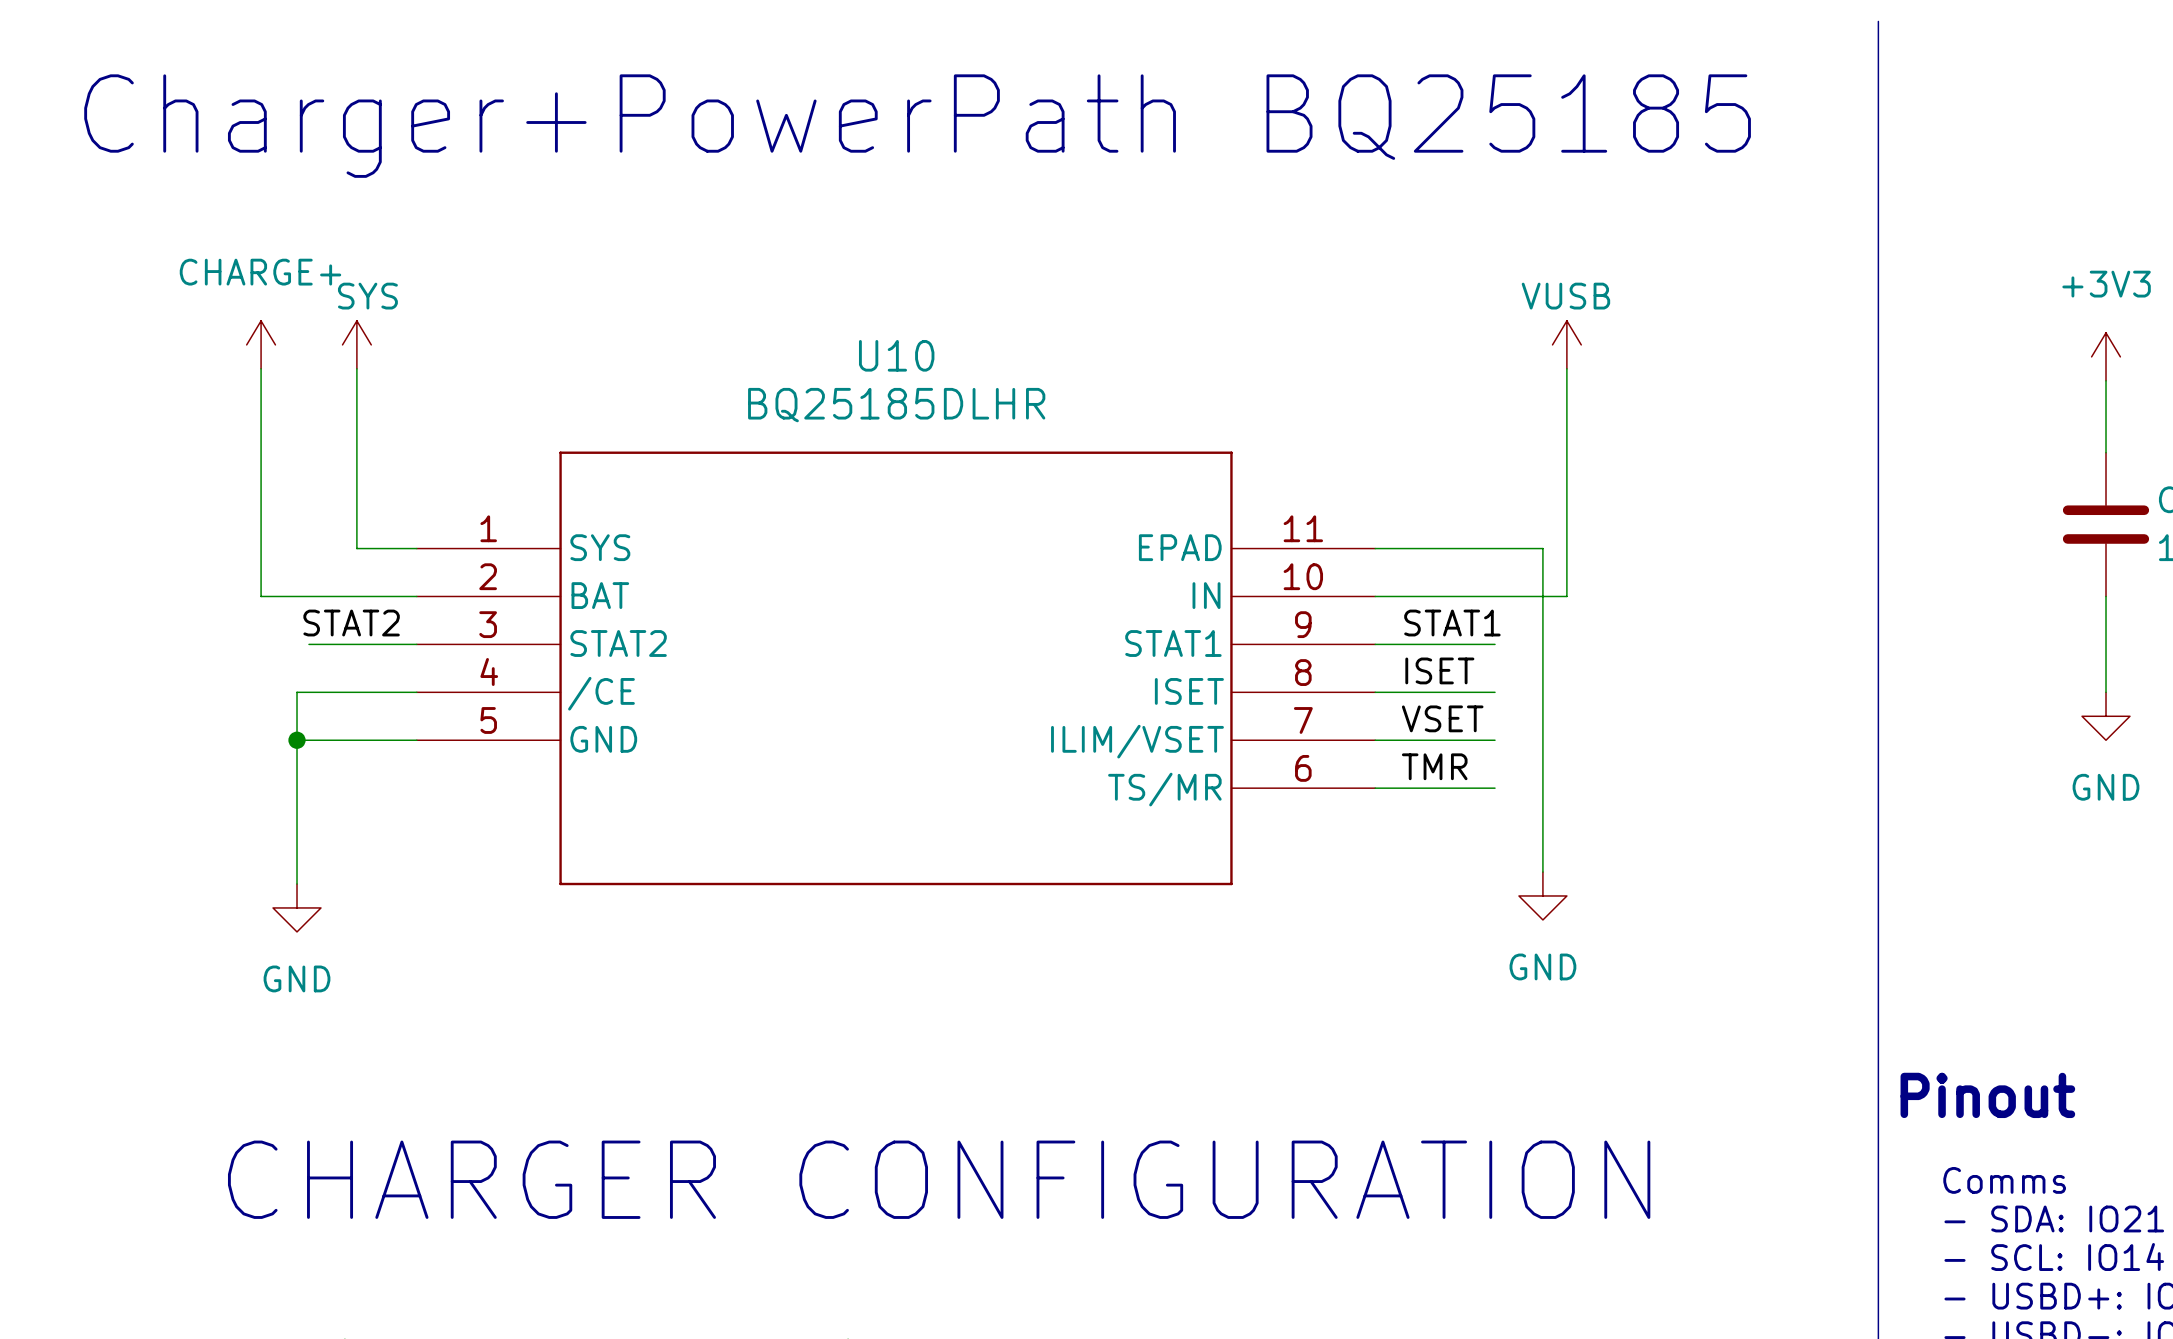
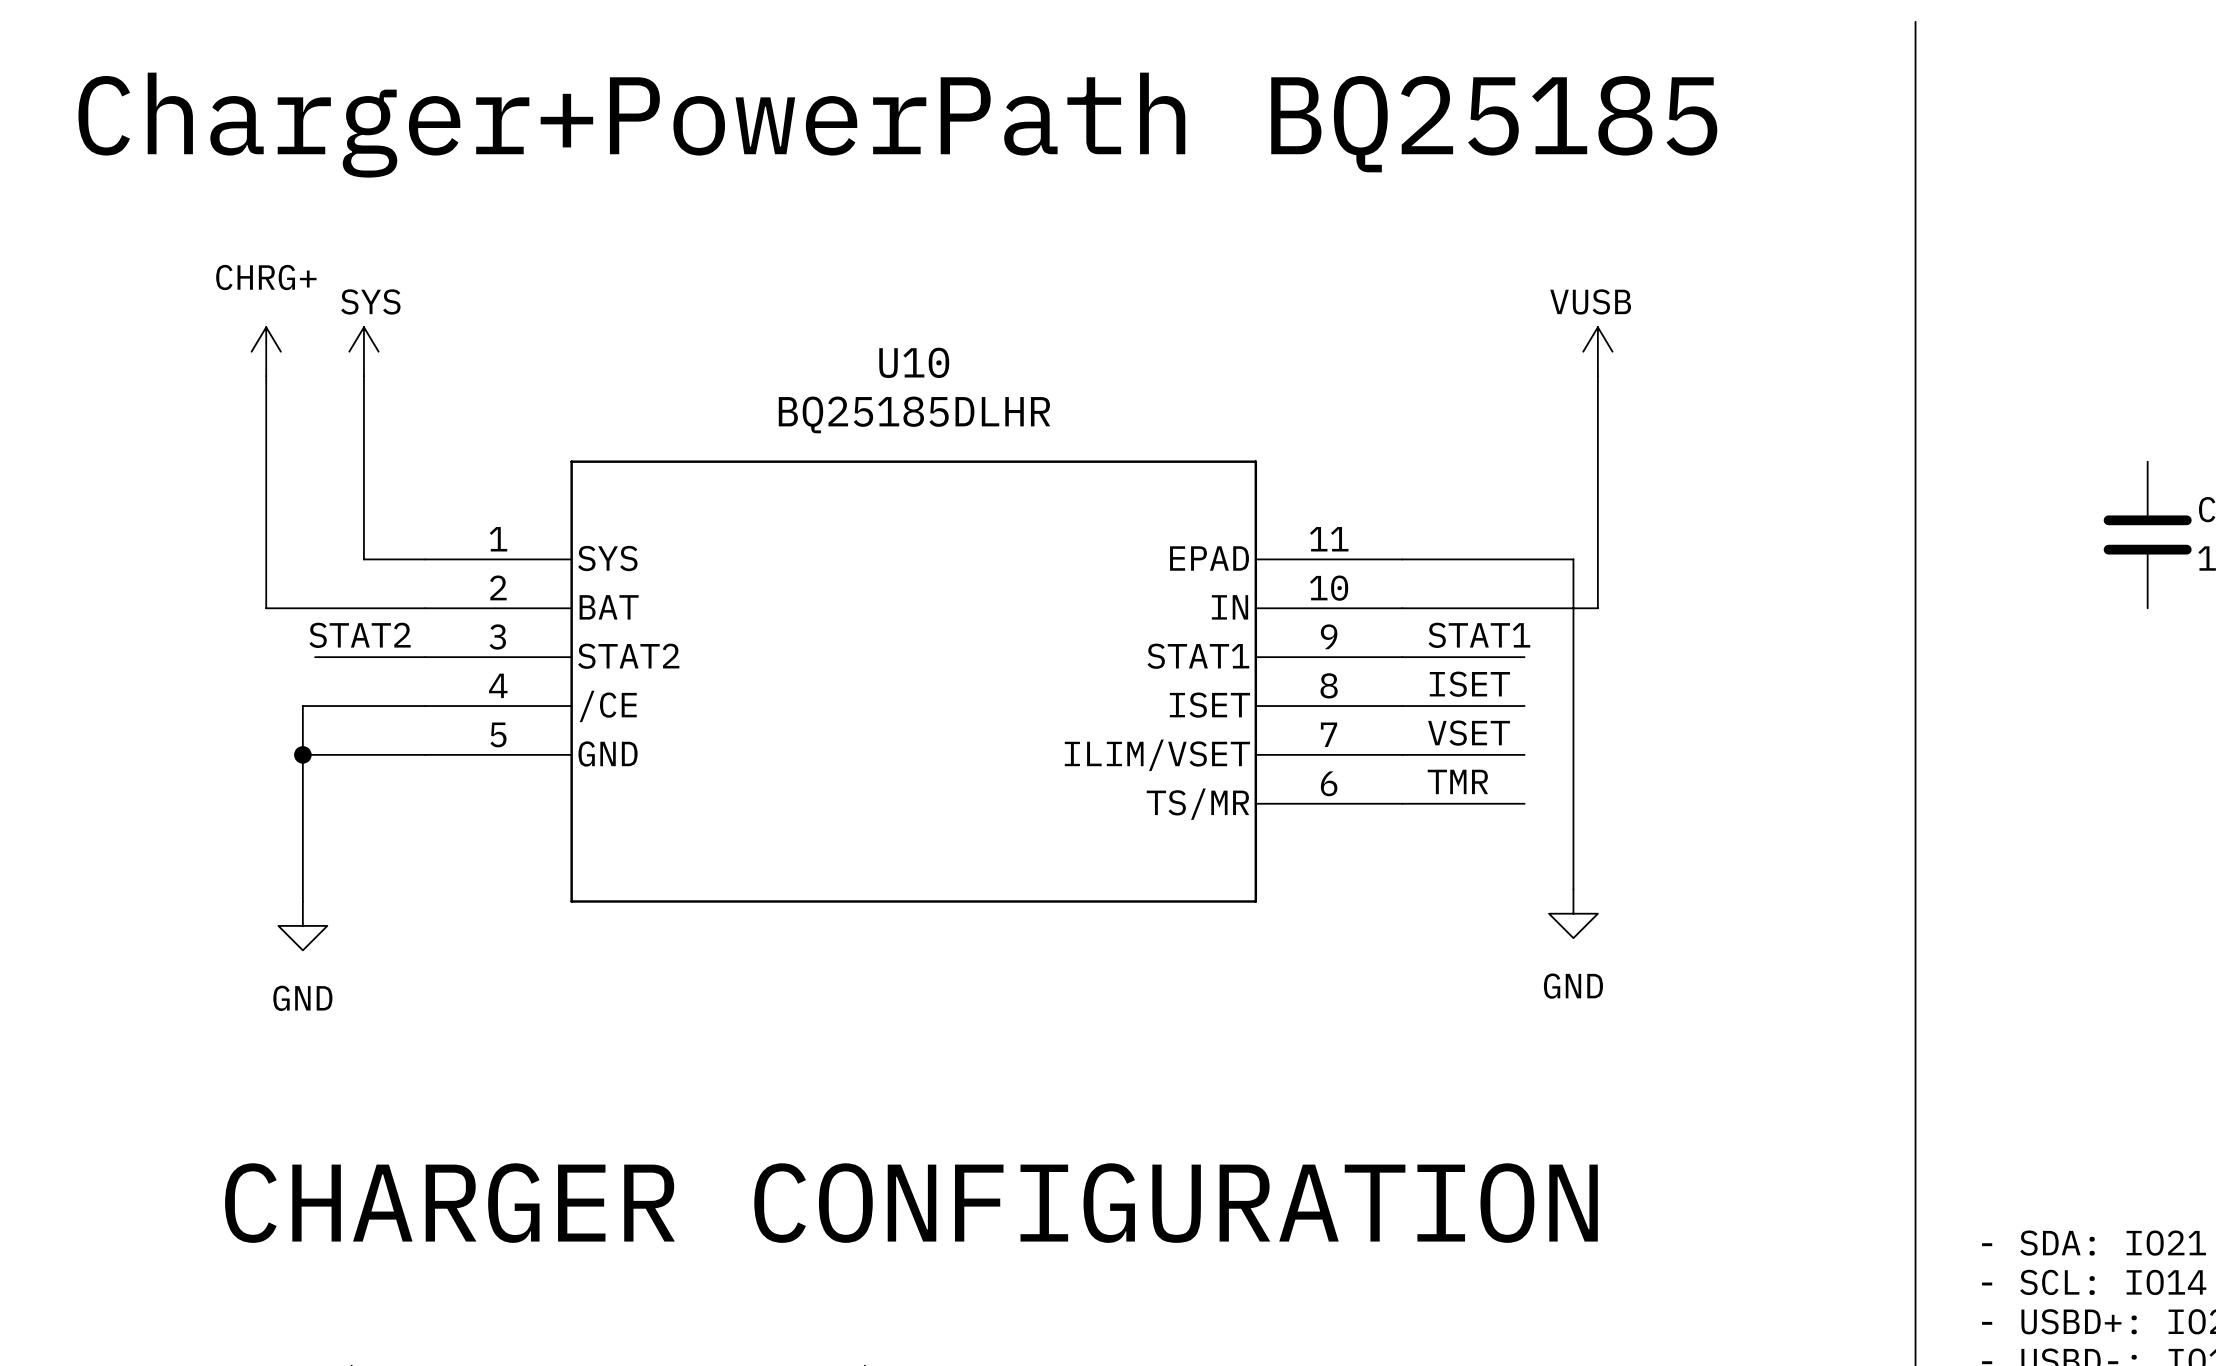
power symbol: CHARGE+ (261, 344) -> CHRG+ (266, 351)
power symbol: +3V3 (2106, 356) -> none
wire: (2106, 380) (2106, 452) -> none
wire: (2106, 596) (2106, 692) -> none
power symbol: GND (2106, 716) -> none
text: Pinout (1987, 1095) -> none
text: Comms (2004, 1180) -> none

